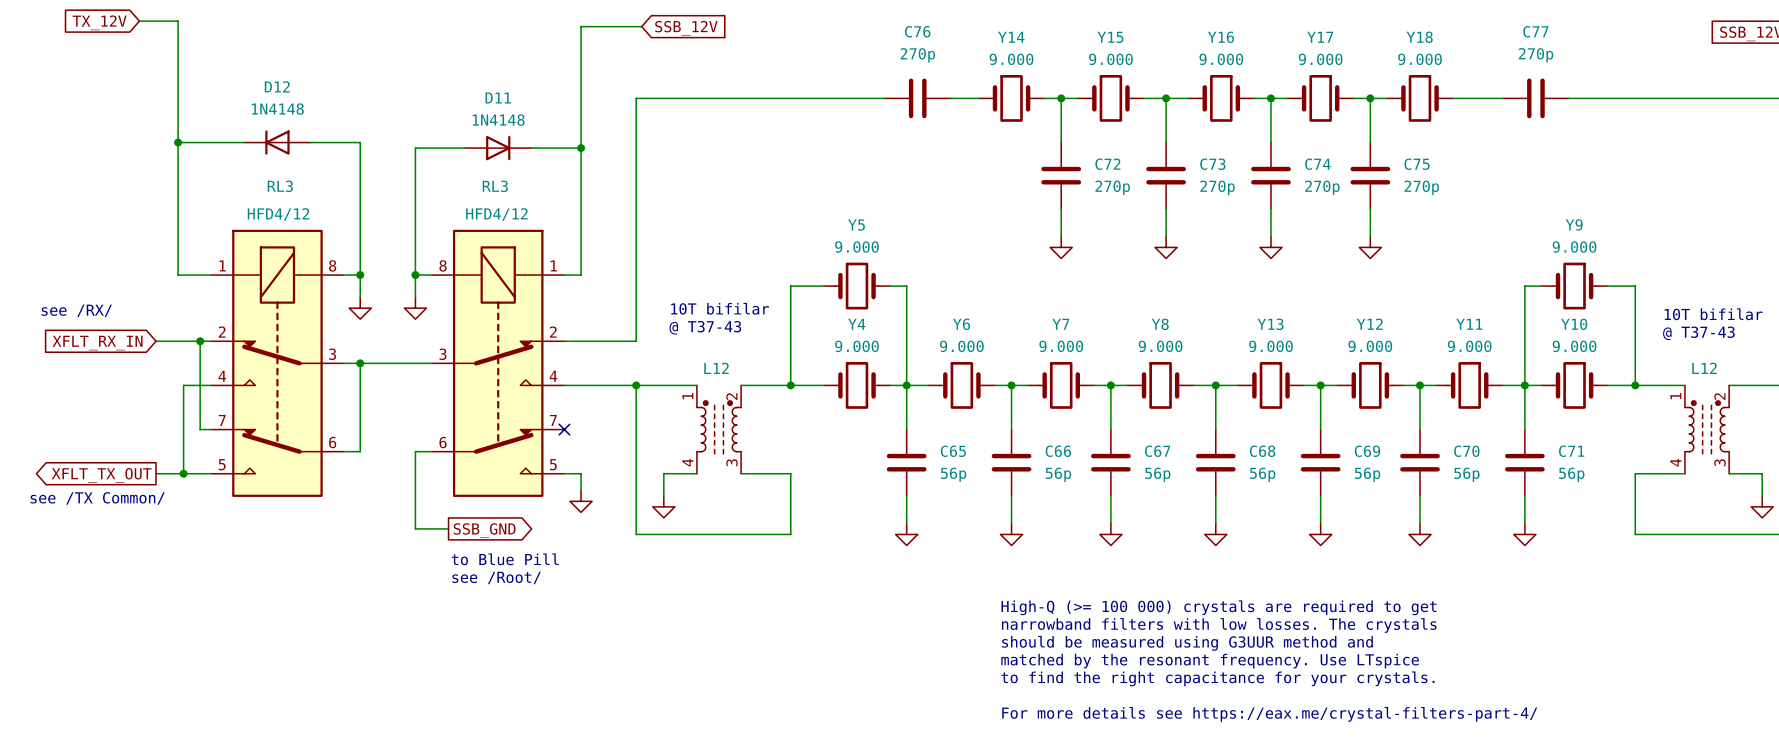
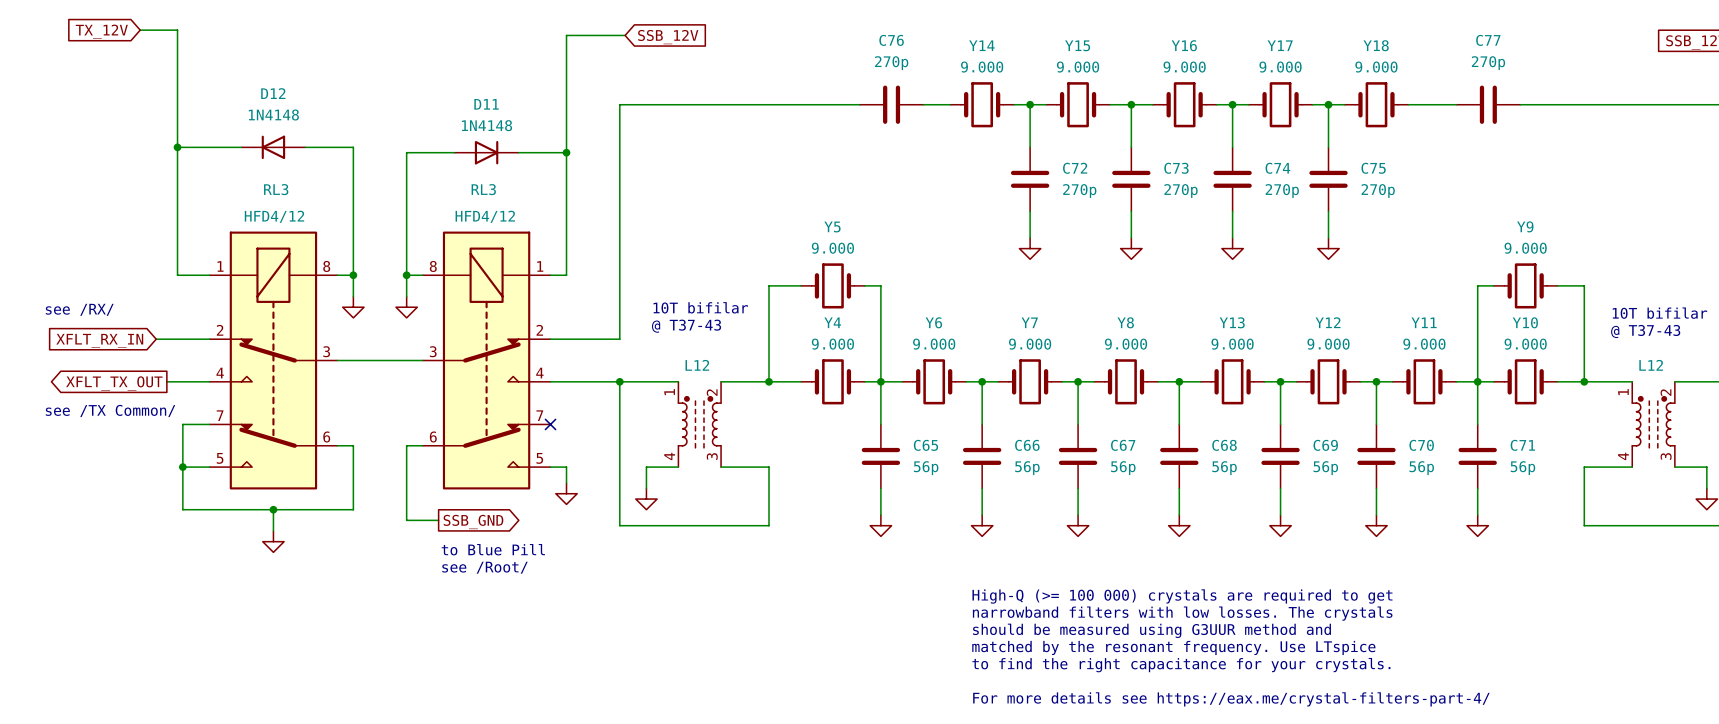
wire: (200, 341) (200, 429) -> (182, 424) (198, 424)
junction: (200, 341) -> none
wire: (360, 363) (360, 451) -> none
junction: (360, 363) -> none
wire: (183, 385) (183, 429) -> (182, 381) (166, 381)
wire: (156, 473) (183, 473) -> (353, 445) (353, 509) (182, 509) (182, 467)
global label position: XFLT_TX_OUT (101, 475) -> XFLT_TX_OUT (114, 383)
text position: see /TX Common/ (97, 498) -> see /TX Common/ (110, 410)
wire: none -> (273, 509) (273, 531)
junction: none -> (273, 509)
power symbol: none -> (273, 541)

